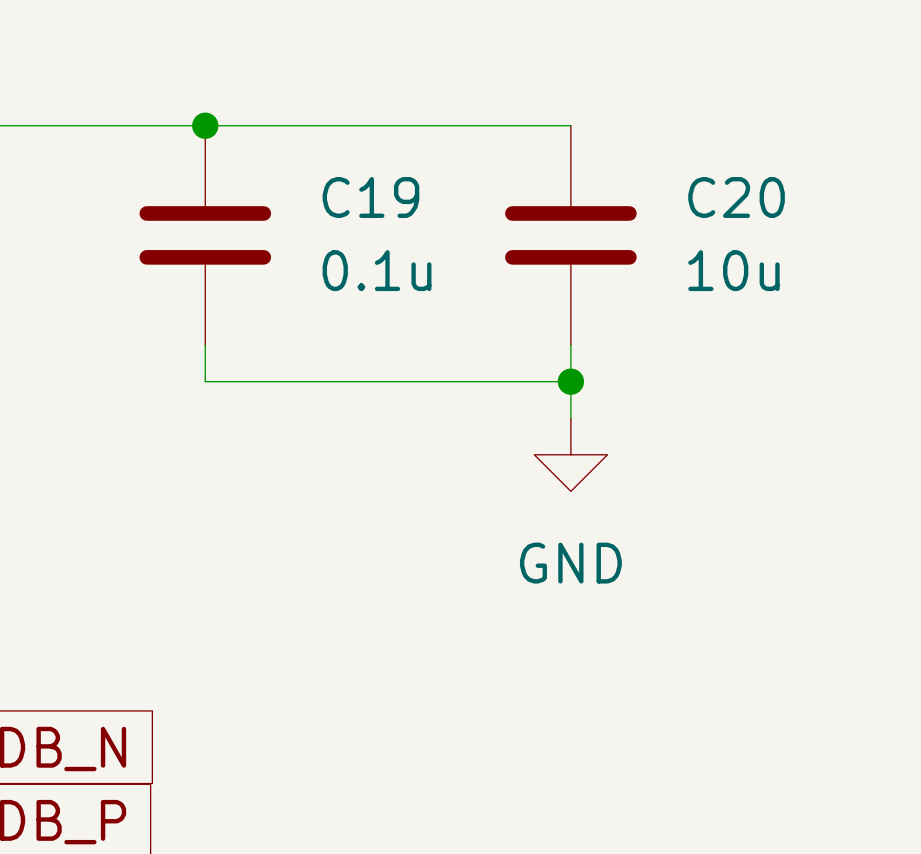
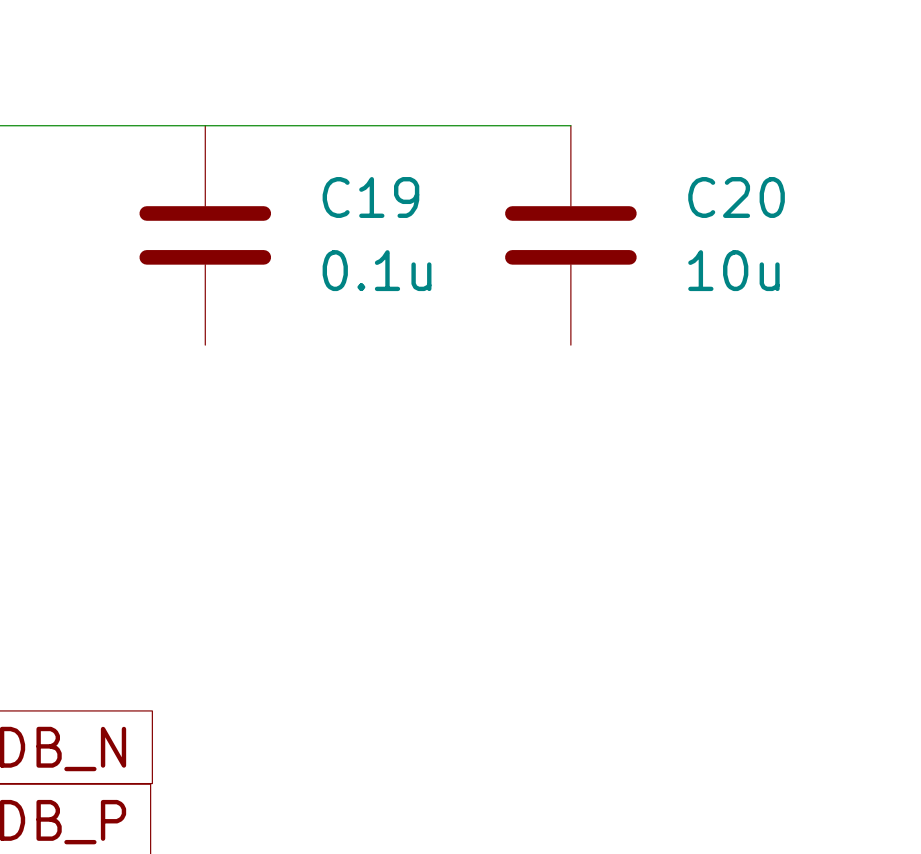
junction: (205, 125) -> none
wire: (205, 345) (205, 381) (570, 381) -> none
wire: (570, 345) (570, 418) -> none
junction: (570, 381) -> none
power symbol: GND (570, 454) -> none

